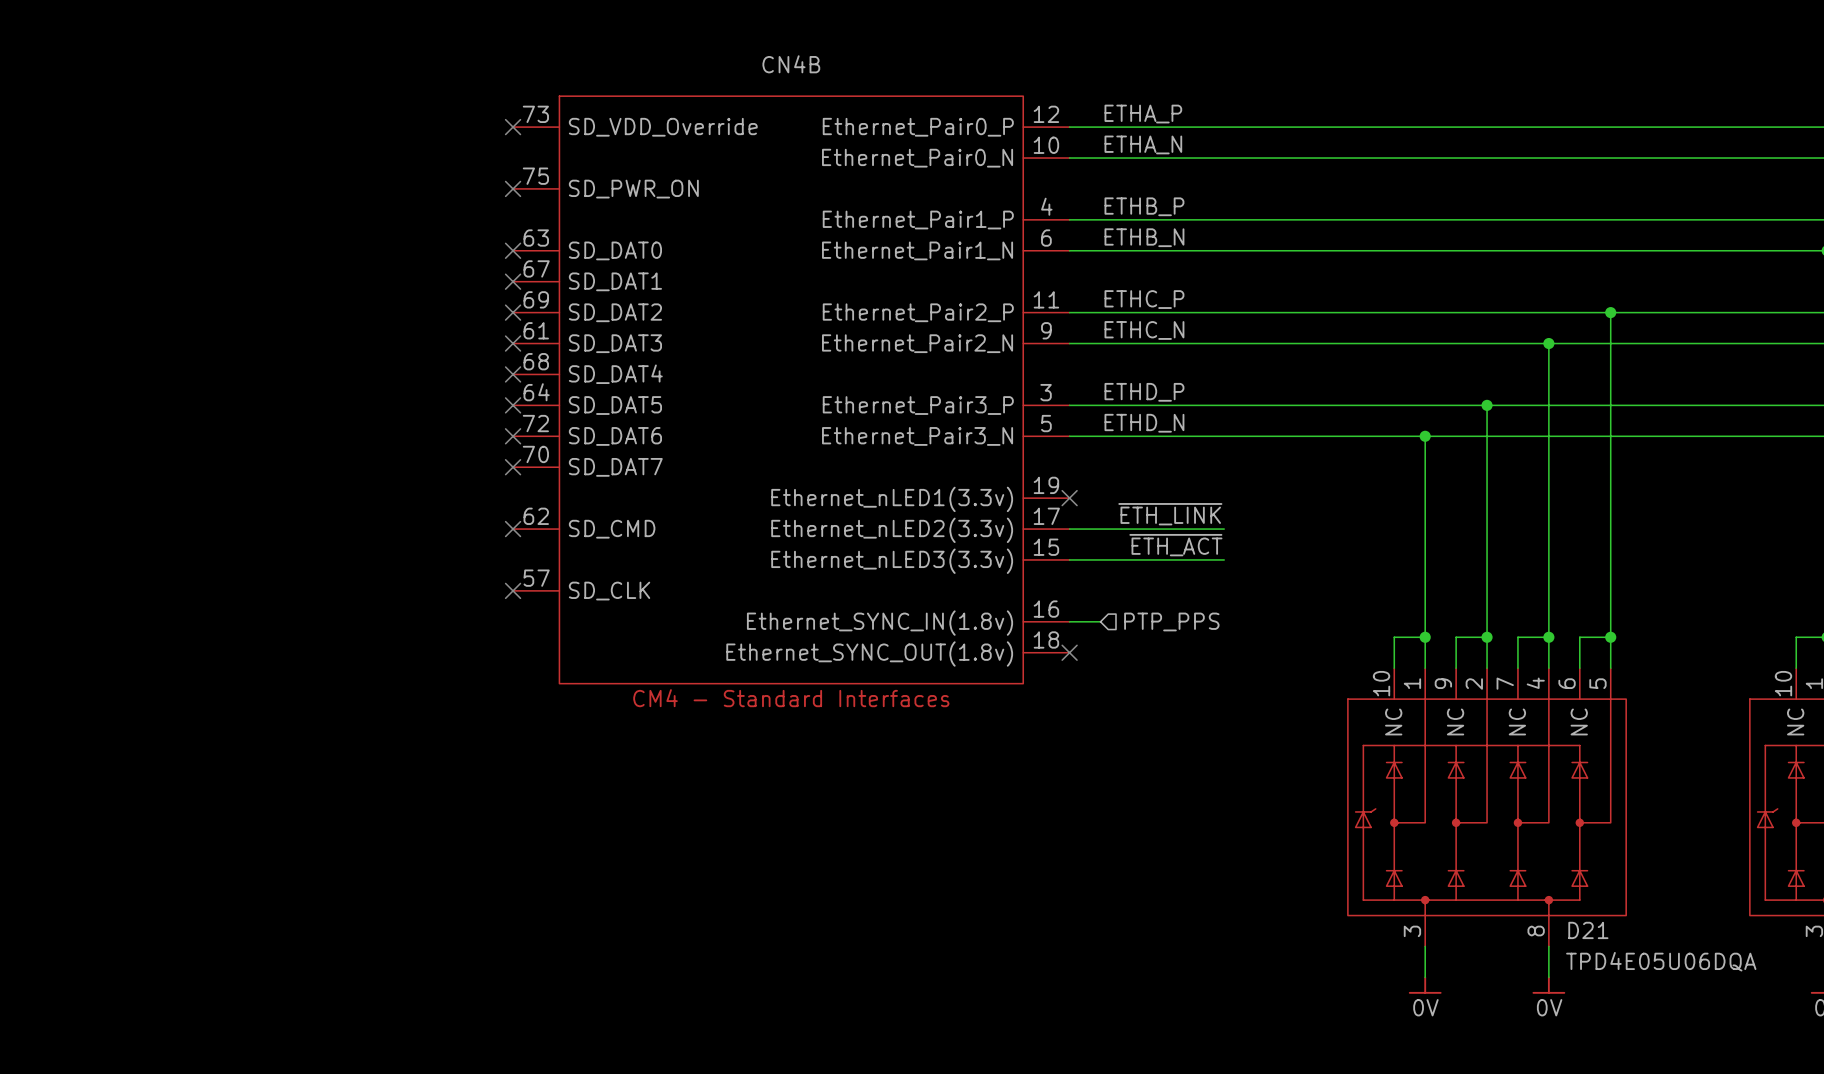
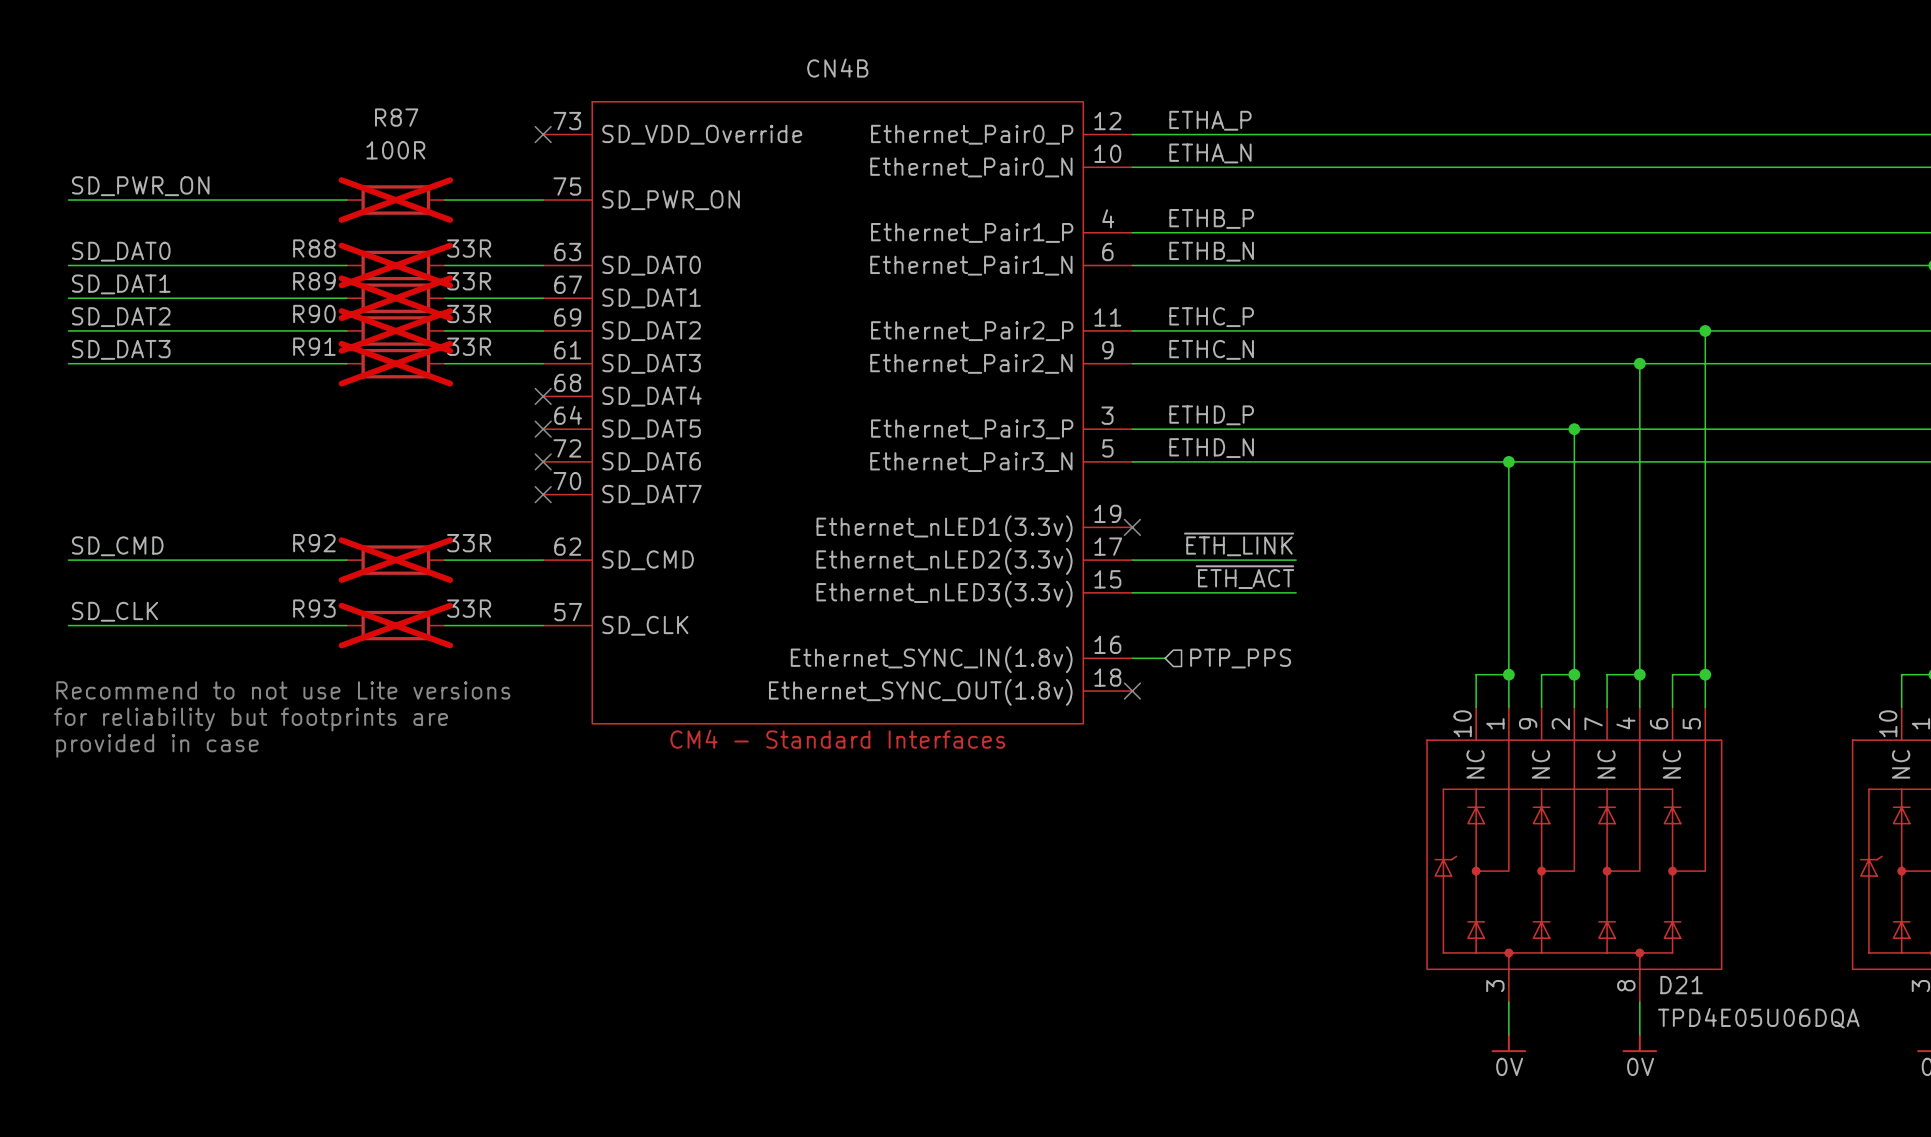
label: none -> SD_PWR_ON (140, 186)
wire: none -> (68, 200) (346, 200)
R87: none -> 100R (395, 200)
wire: none -> (444, 200) (543, 200)
no-connect mark: (513, 188) -> none
label: none -> SD_DAT0 (121, 251)
wire: none -> (68, 265) (346, 265)
R88: none -> 33R (395, 265)
wire: none -> (444, 265) (543, 265)
no-connect mark: (513, 250) -> none
label: none -> SD_DAT1 (121, 284)
wire: none -> (68, 298) (346, 298)
R89: none -> 33R (395, 298)
wire: none -> (444, 298) (543, 298)
no-connect mark: (513, 281) -> none
label: none -> SD_DAT2 (121, 317)
wire: none -> (68, 330) (346, 330)
R90: none -> 33R (395, 330)
wire: none -> (444, 330) (543, 330)
no-connect mark: (513, 312) -> none
label: none -> SD_DAT3 (121, 349)
wire: none -> (68, 363) (346, 363)
R91: none -> 33R (395, 363)
wire: none -> (444, 363) (543, 363)
no-connect mark: (513, 343) -> none
label: none -> SD_CMD (117, 546)
wire: none -> (68, 560) (346, 560)
R92: none -> 33R (395, 560)
wire: none -> (444, 560) (543, 560)
no-connect mark: (513, 529) -> none
label: none -> SD_CLK (115, 611)
wire: none -> (68, 625) (346, 625)
R93: none -> 33R (395, 625)
wire: none -> (444, 625) (543, 625)
no-connect mark: (513, 590) -> none
text: none -> Recommend to not use Lite versions (283, 690)
text: none -> for reliability but footprints are (251, 719)
text: none -> provided in case (157, 745)

